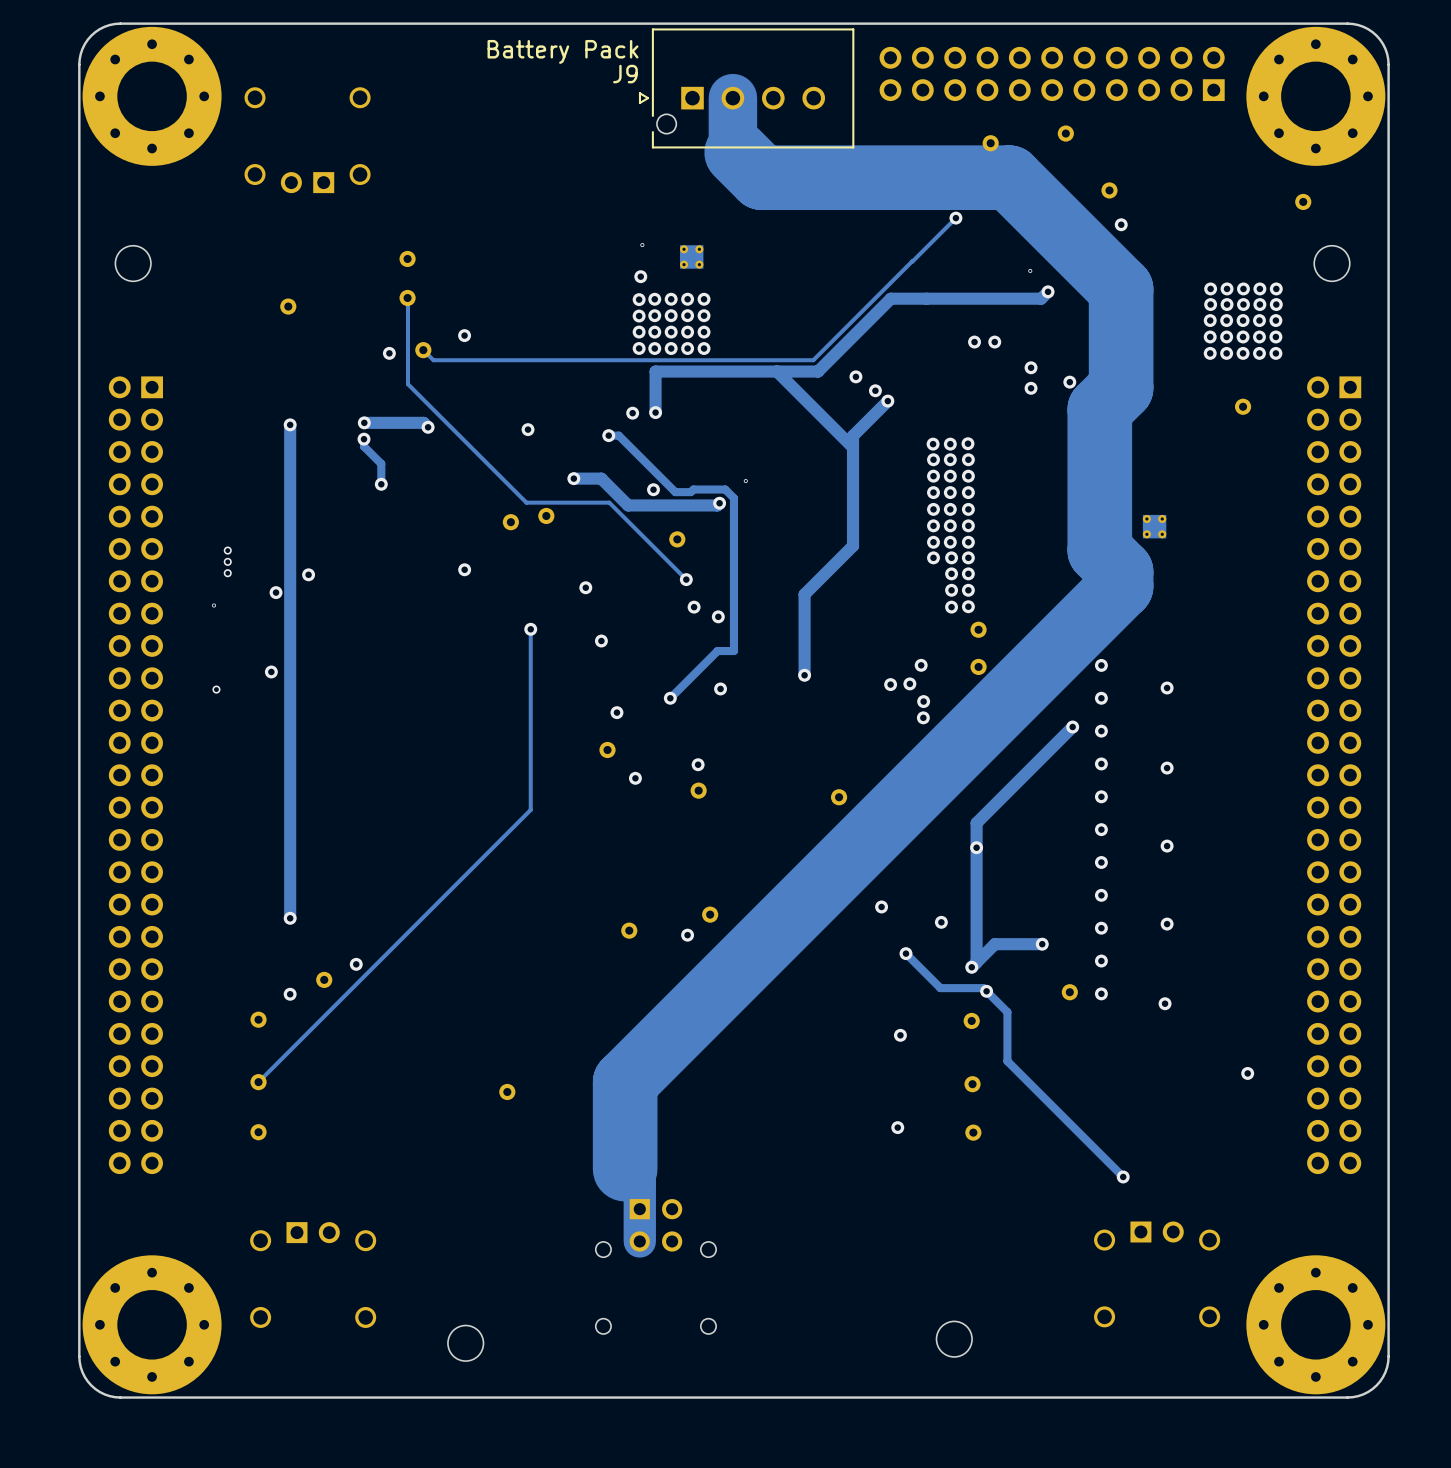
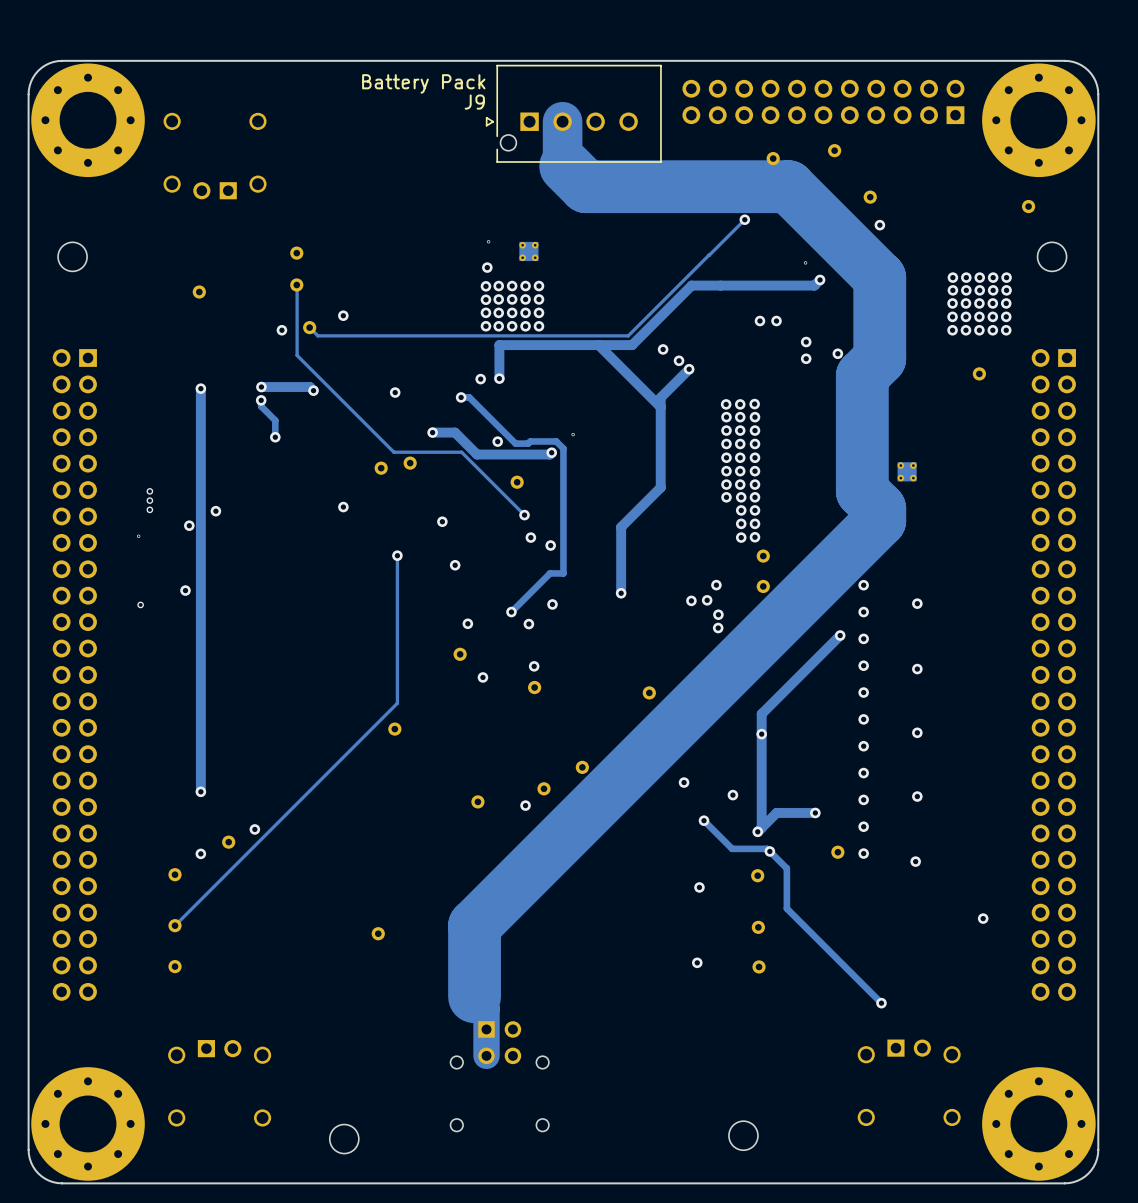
via: none -> (528, 624)
part: none -> (394, 729)
part: none -> (582, 767)

